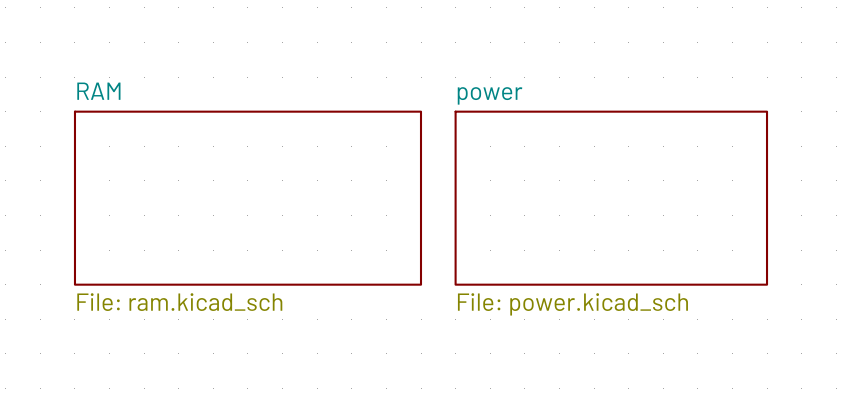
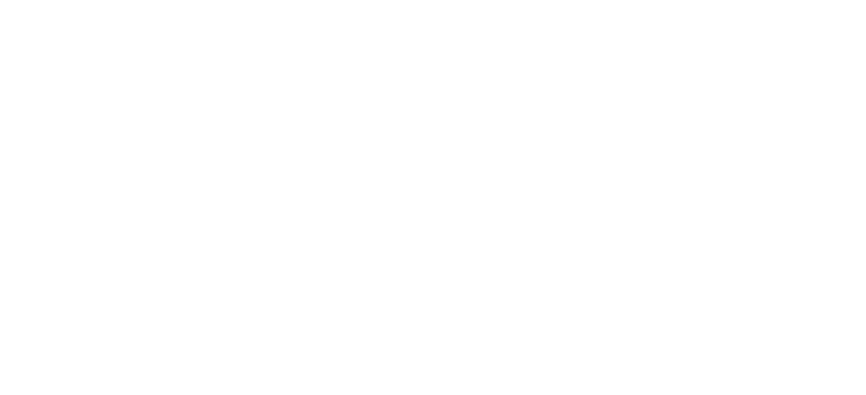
sheet RAM: File: ram.kicad_sch (247, 198) -> none
sheet power: File: power.kicad_sch (611, 198) -> none

